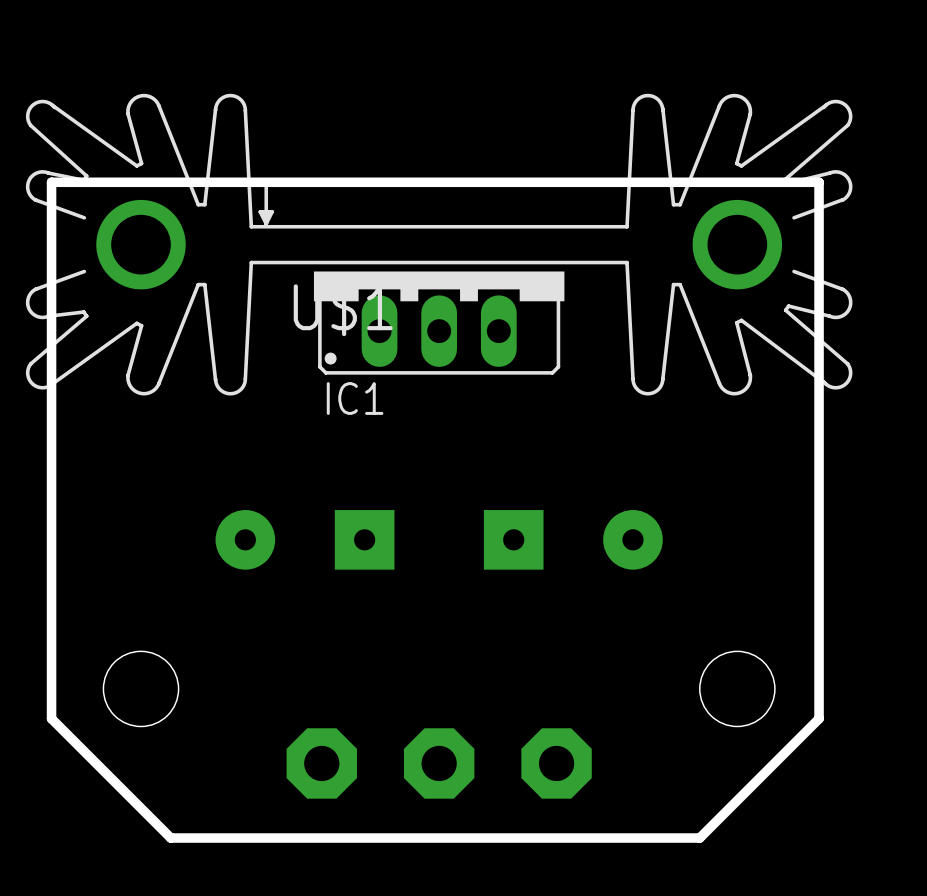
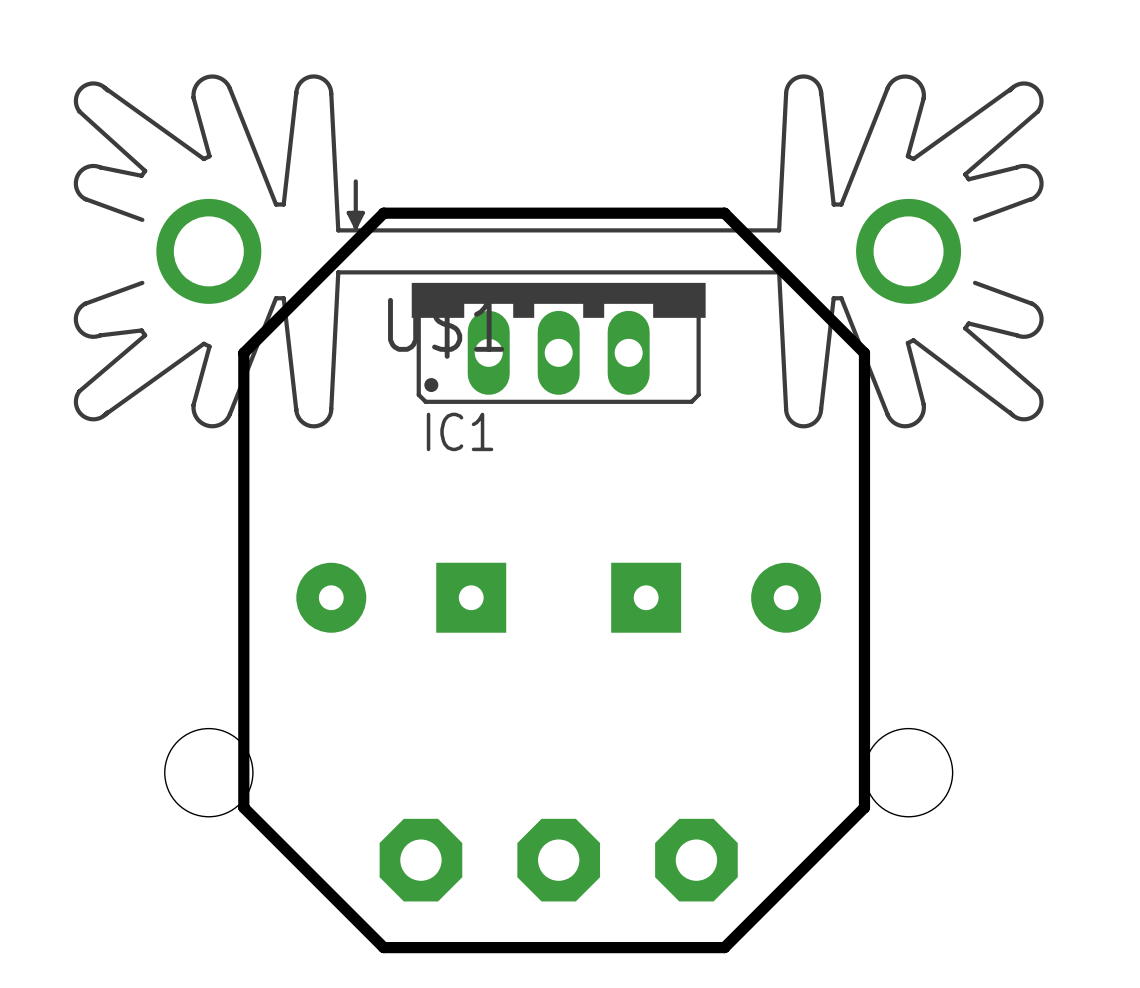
board edge: (290, 838) (170, 838) (51, 718) (51, 182) (819, 182) (819, 718) (699, 838) (580, 838) -> (383, 947) (243, 807) (243, 353) (383, 213) (724, 213) (864, 353) (864, 807) (724, 947)

